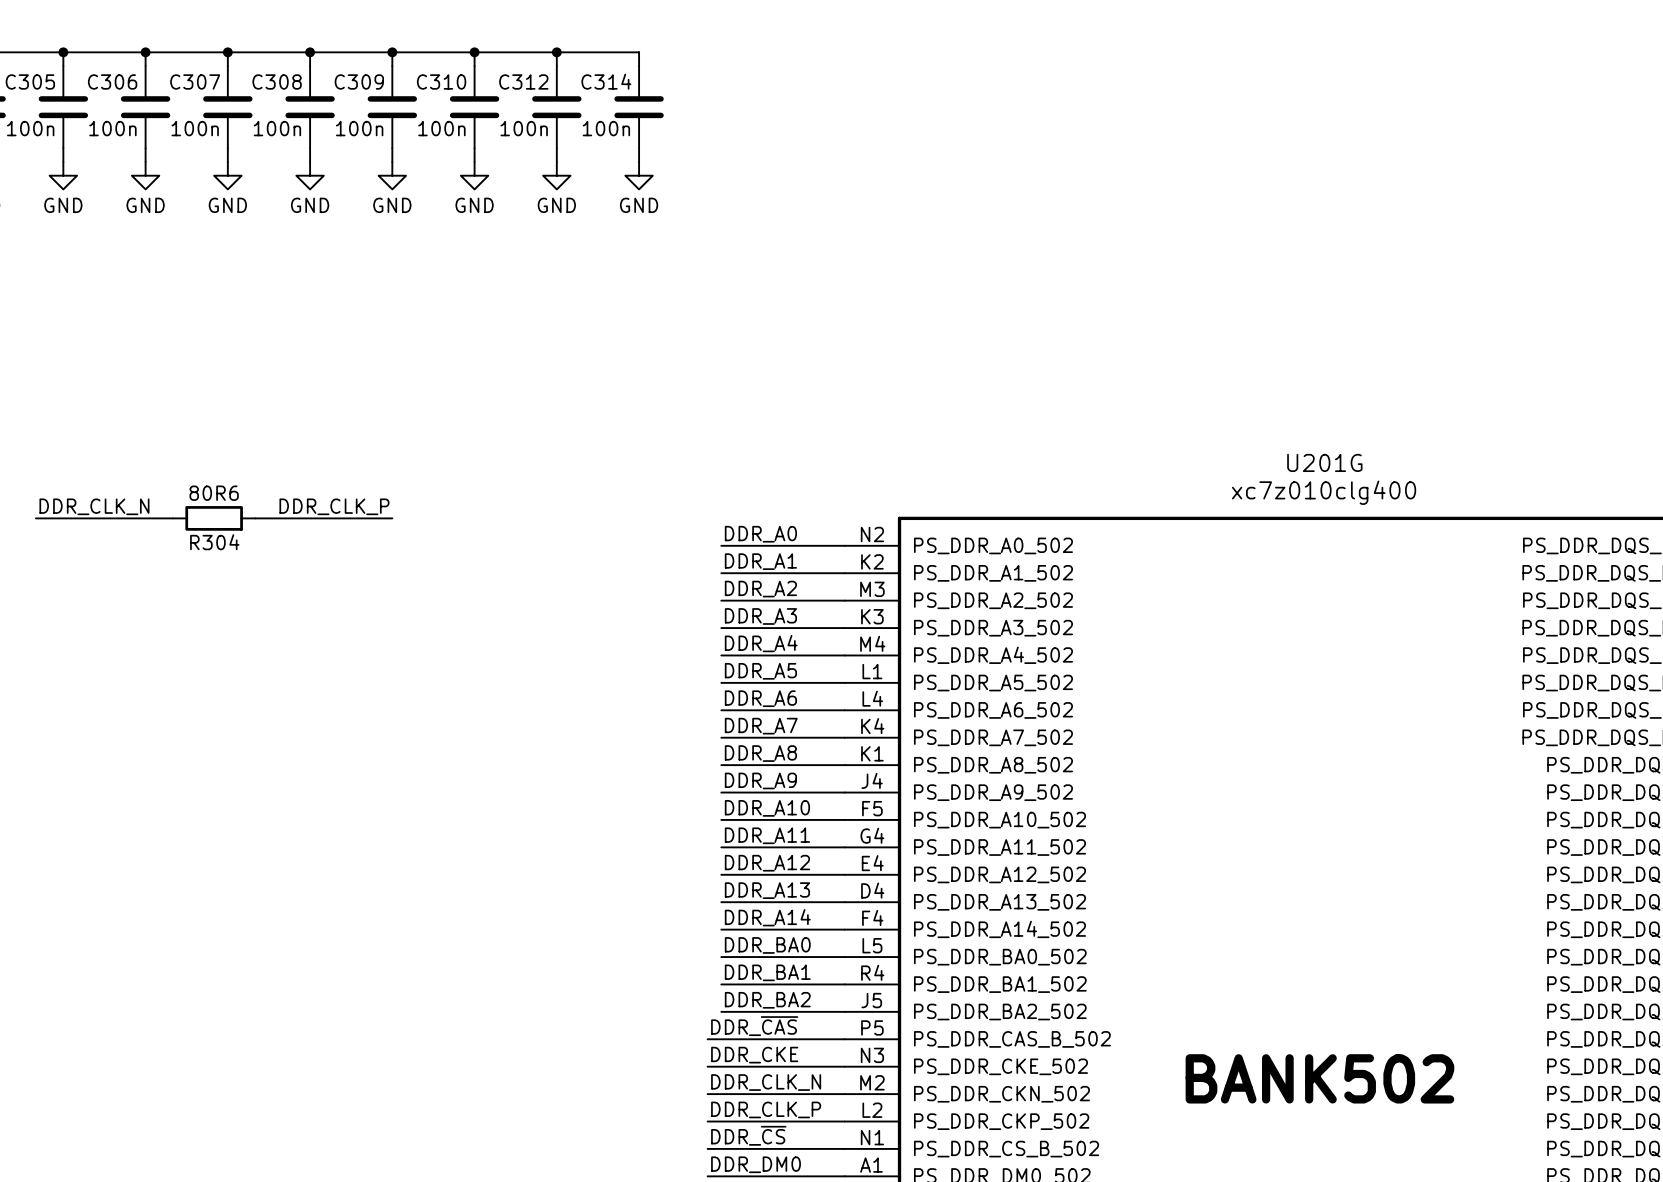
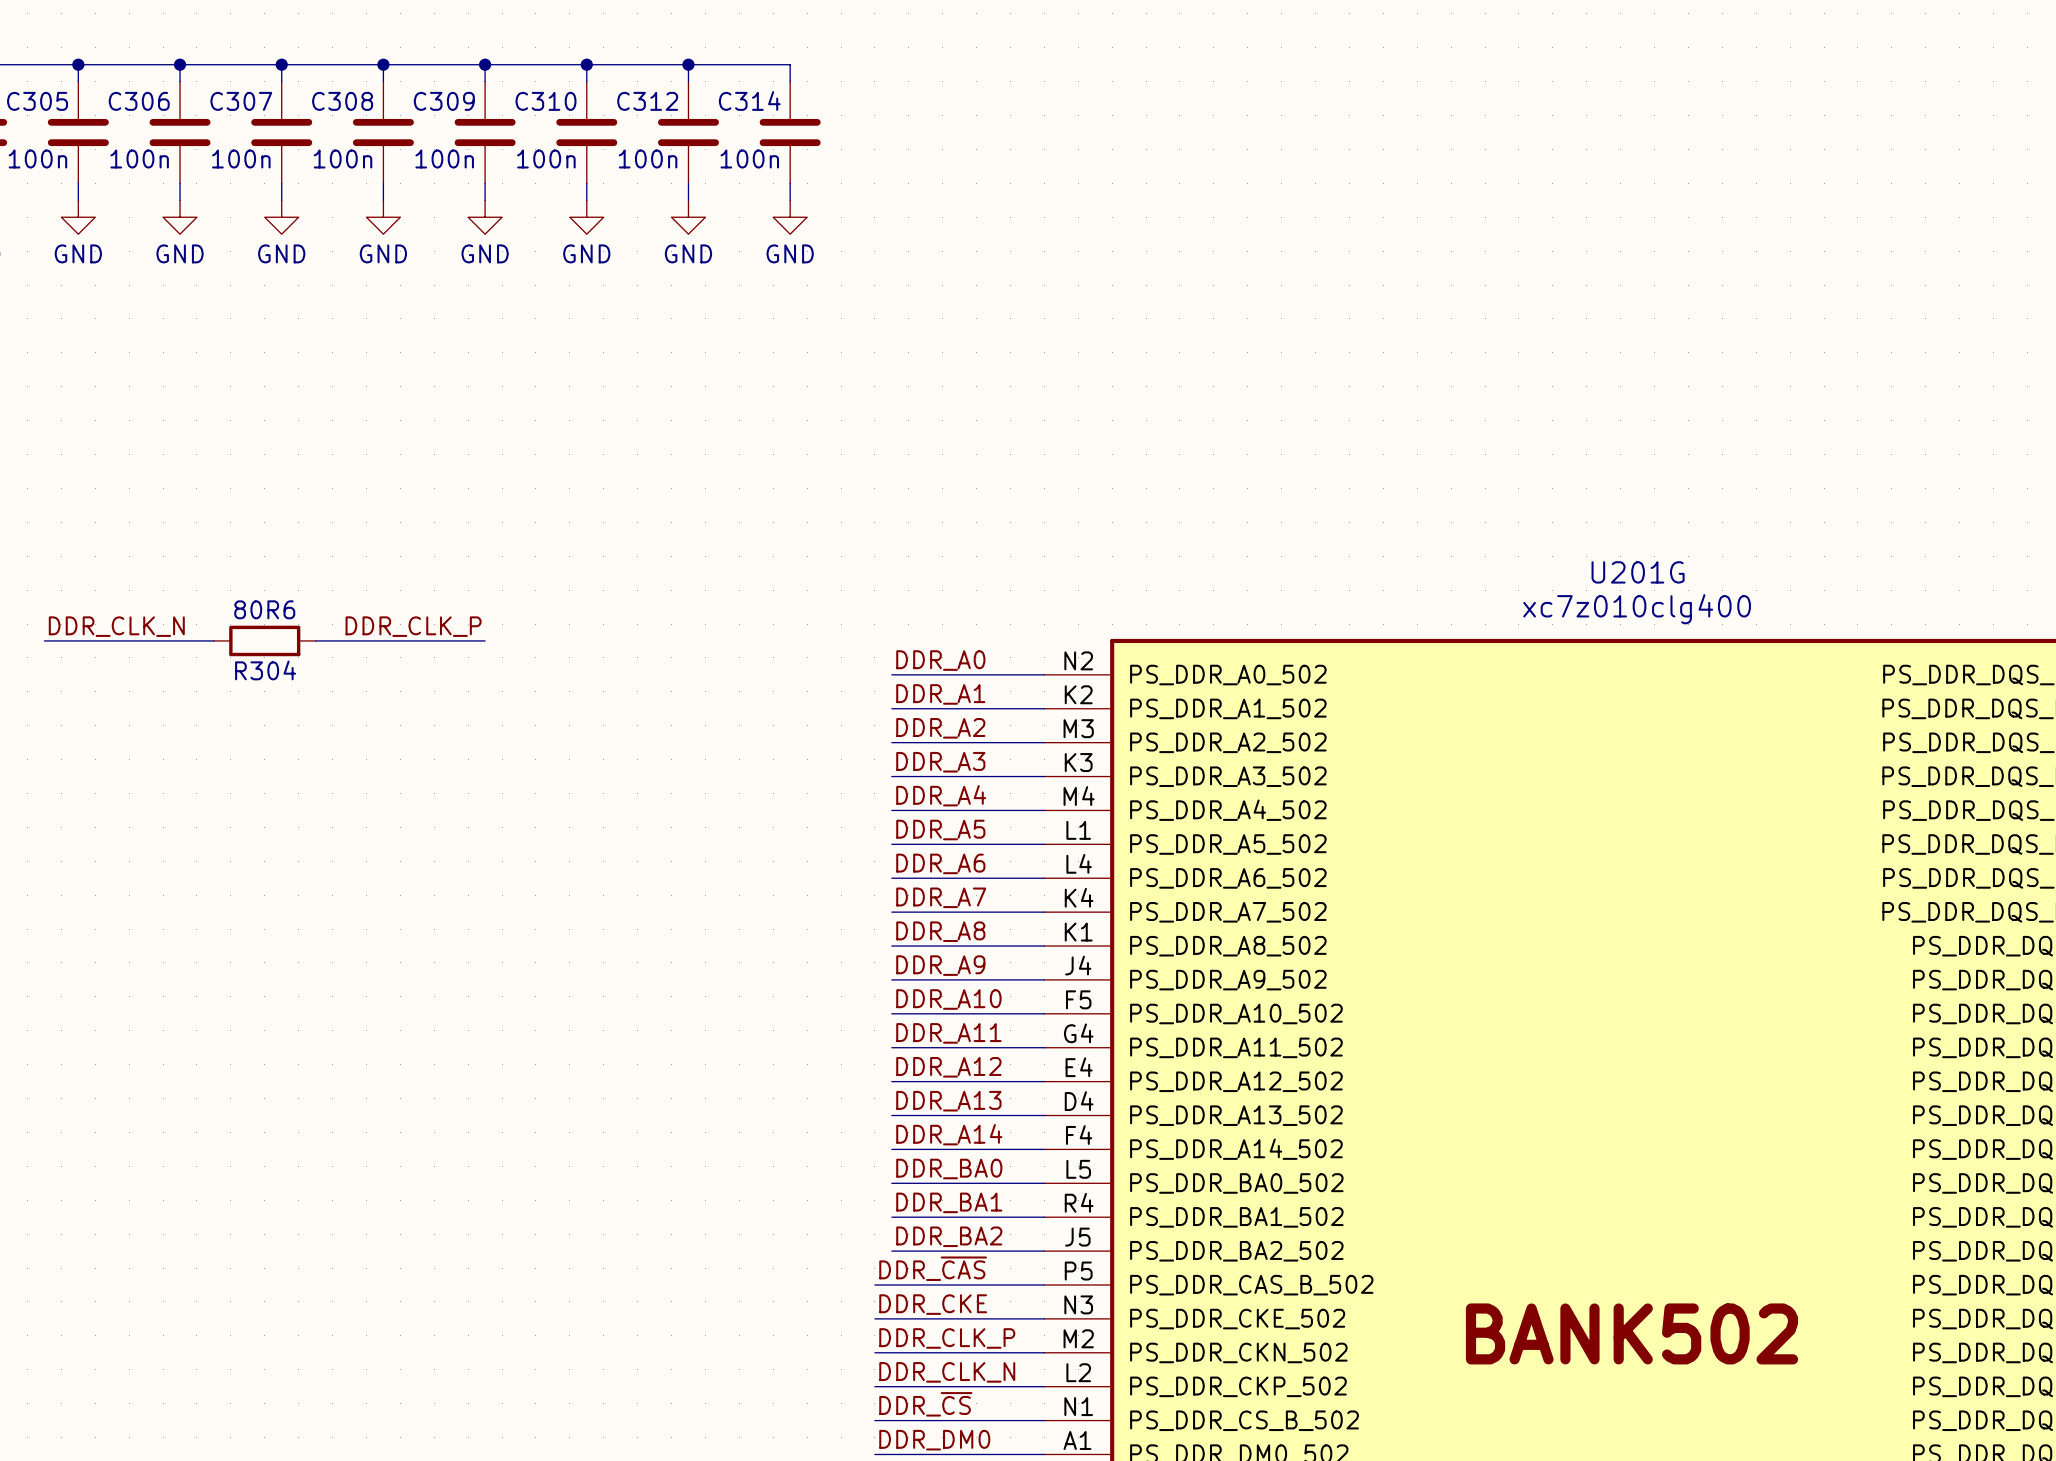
label: DDR_CLK_N (766, 1082) -> DDR_CLK_P (947, 1338)
label: DDR_CLK_P (766, 1109) -> DDR_CLK_N (947, 1372)

